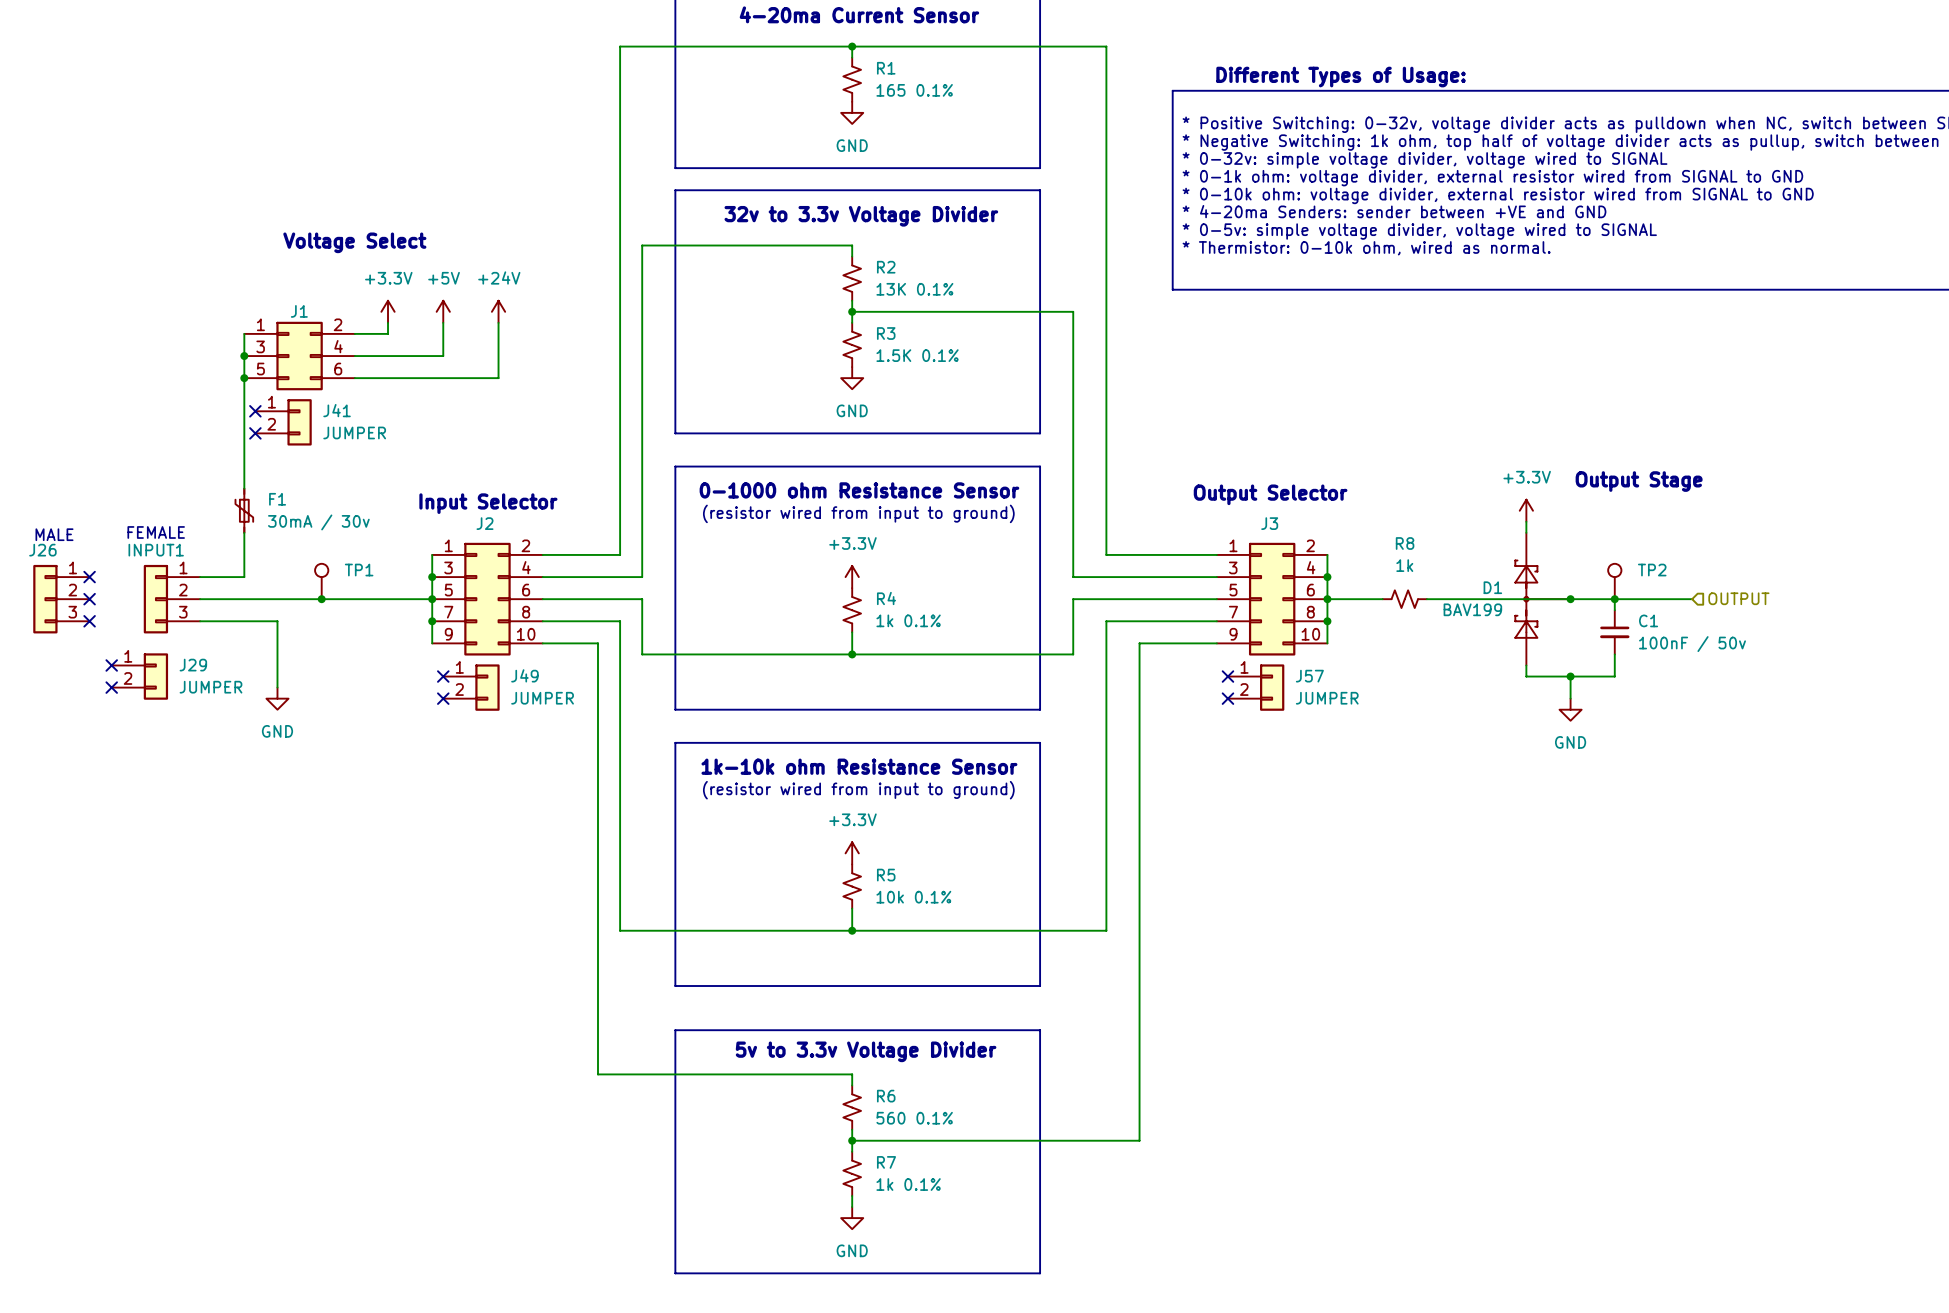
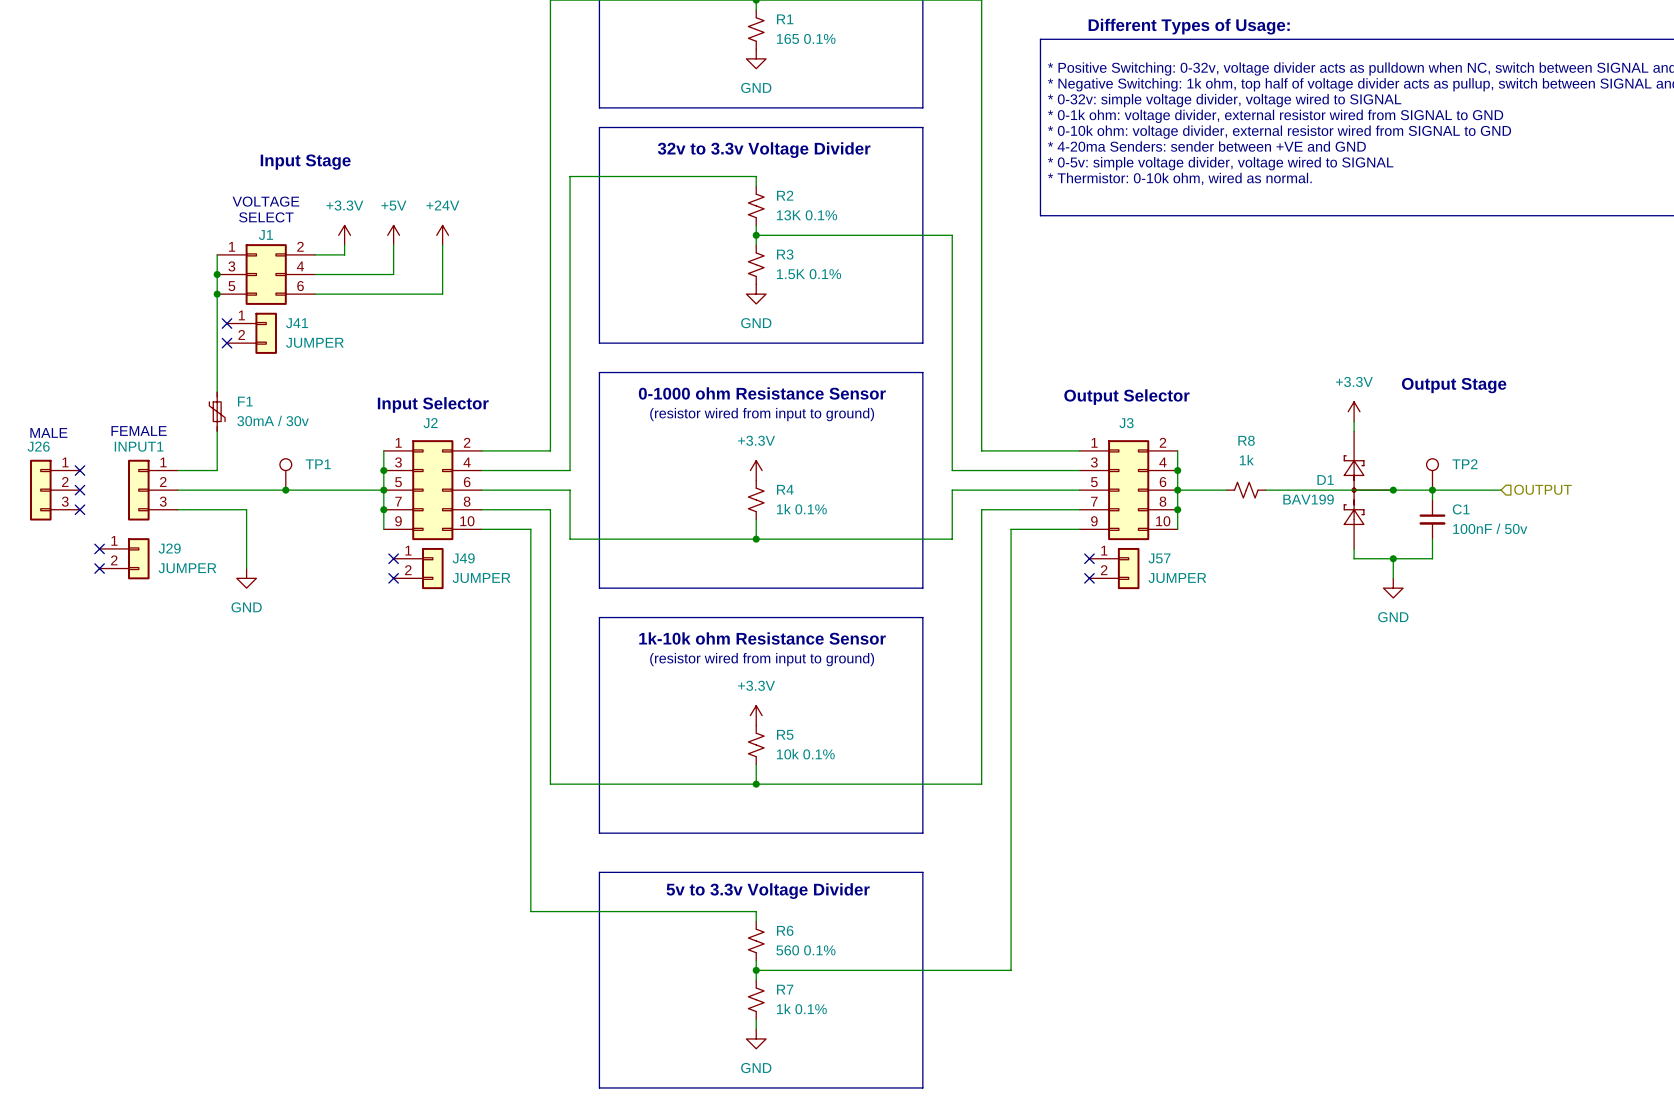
text: none -> Input Stage (305, 162)
text: Voltage Select (354, 242) -> none
text: none -> VOLTAGE (265, 201)
text: none -> SELECT (266, 217)

